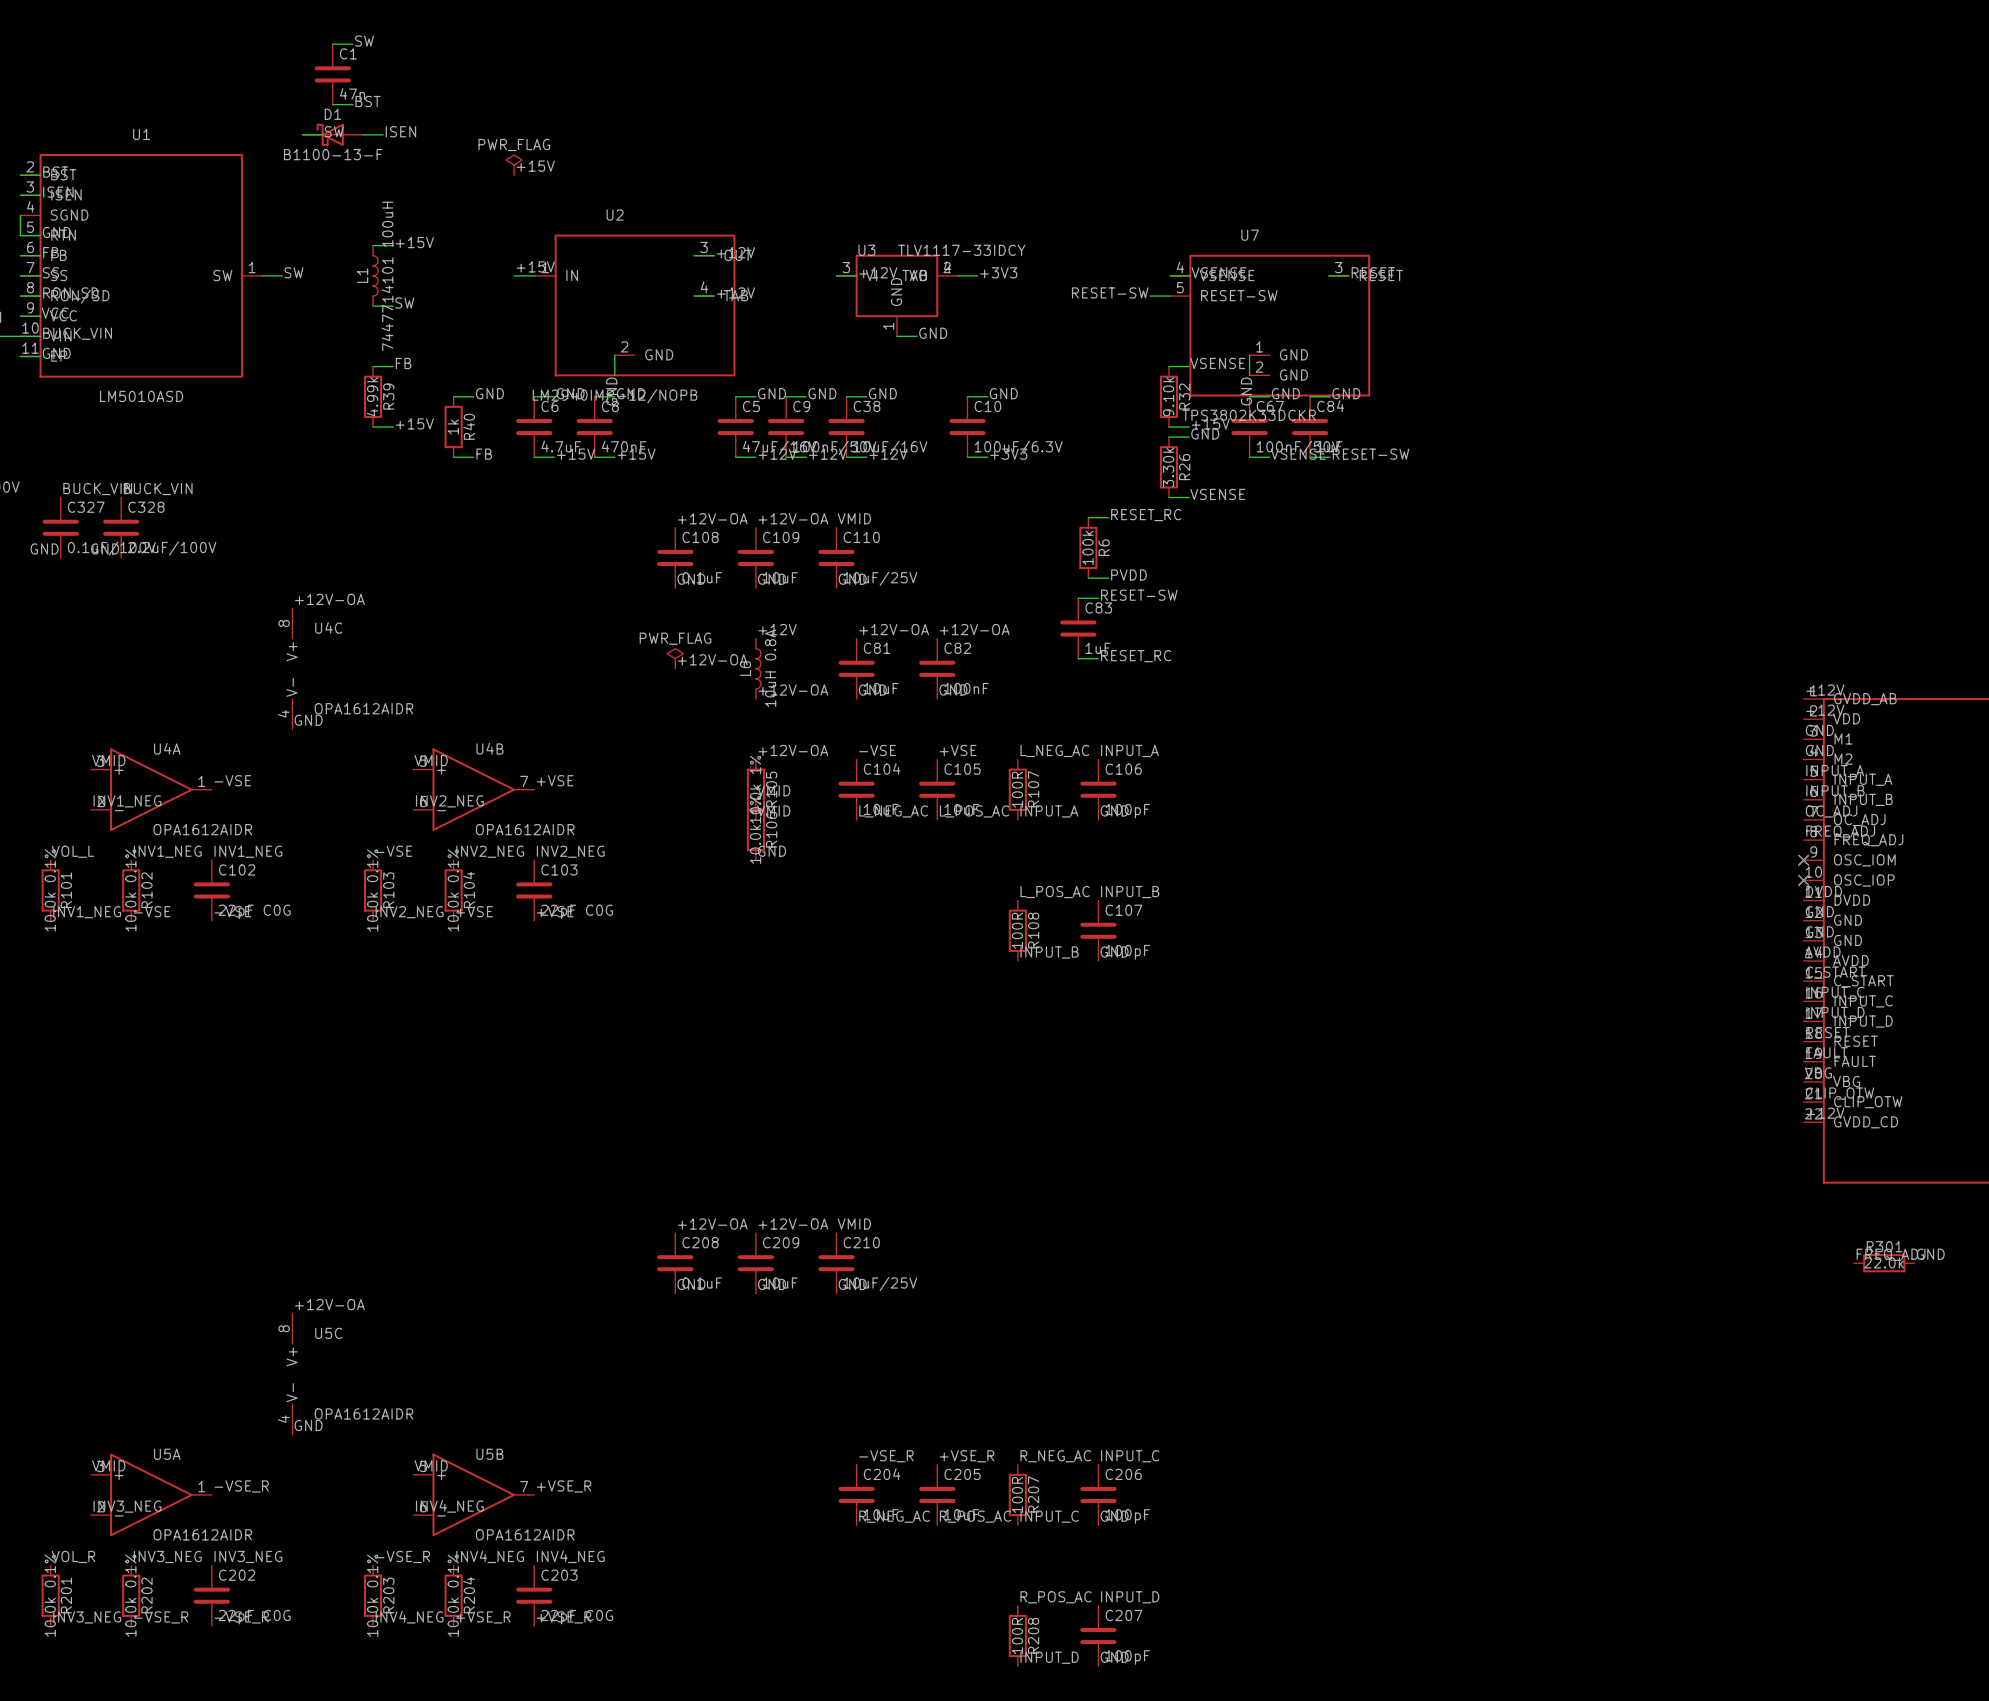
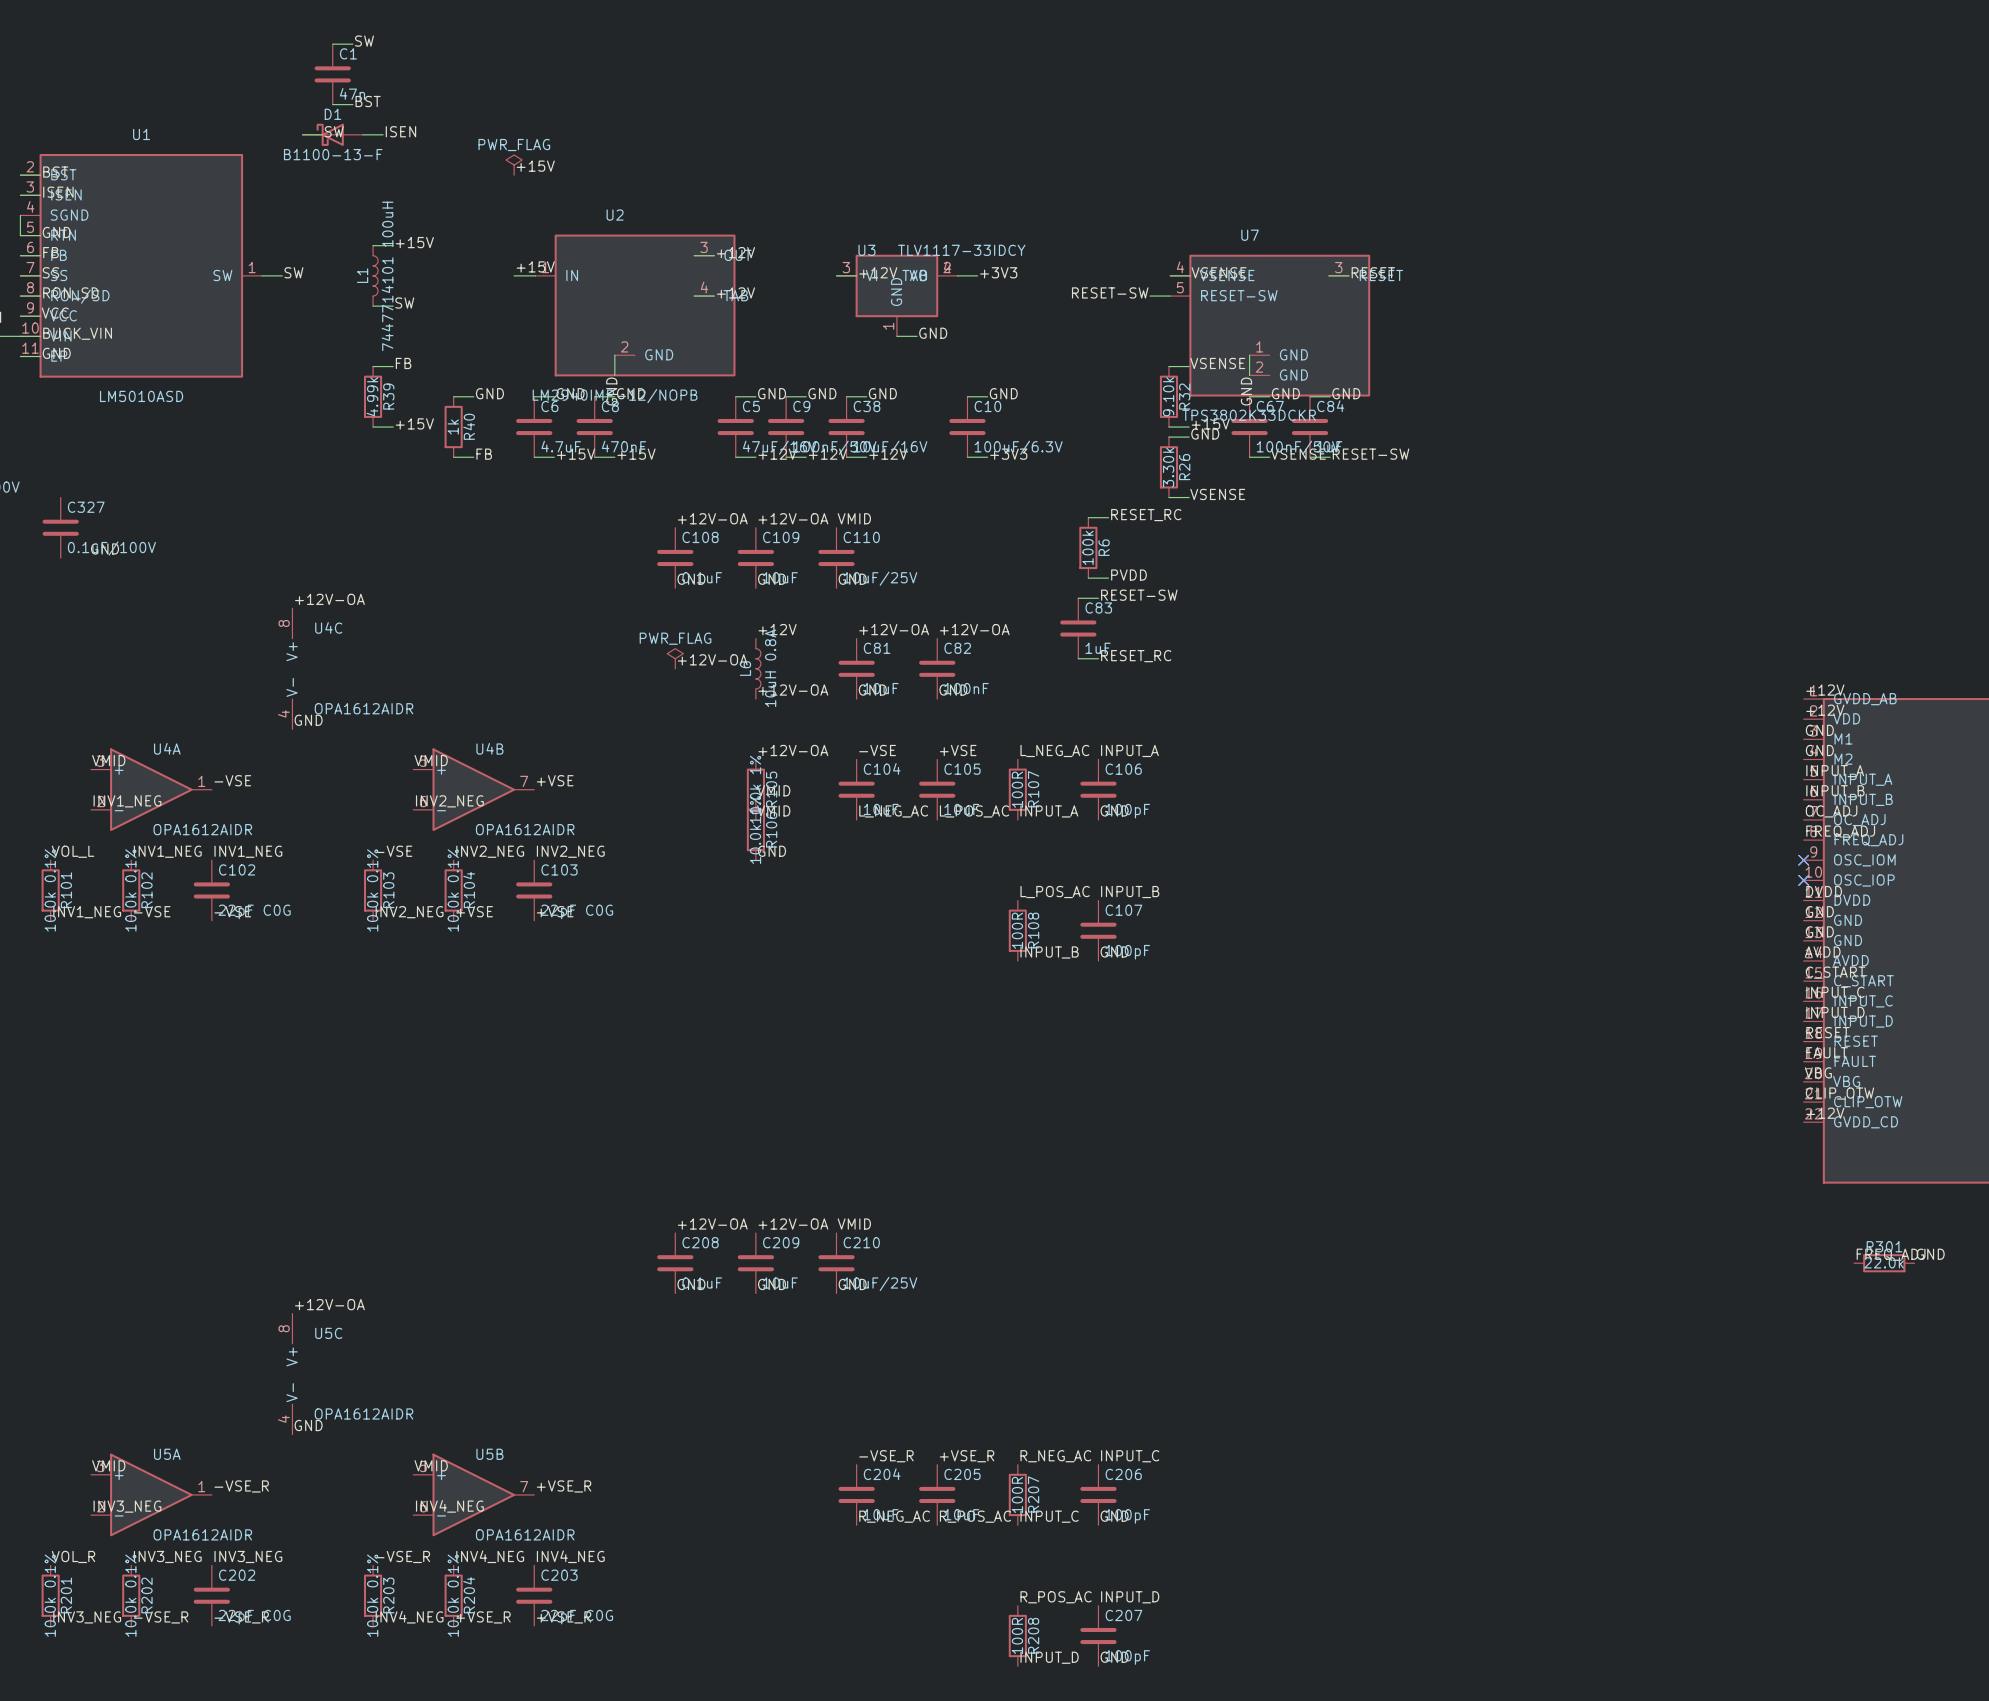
label: BUCK_VIN (97, 489) -> none
label: BUCK_VIN (158, 489) -> none
C328: 2.2uF/100V (121, 527) -> none
label: GND (44, 549) -> none

